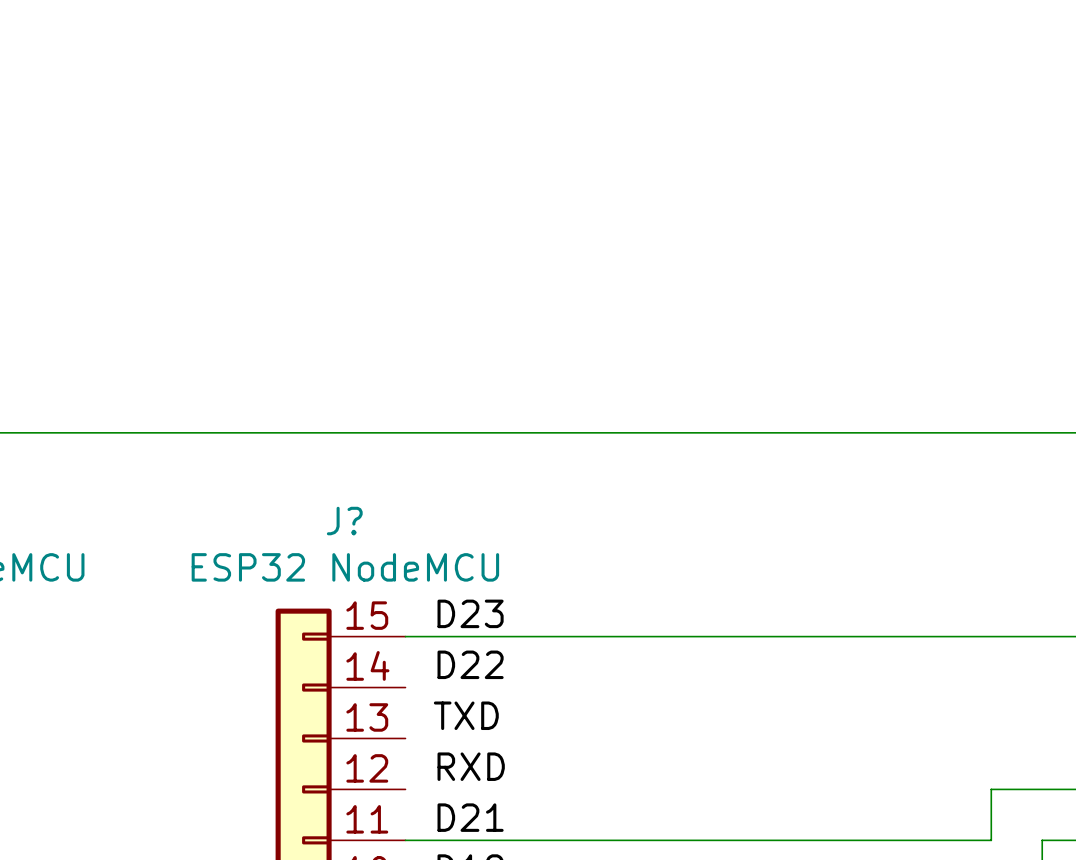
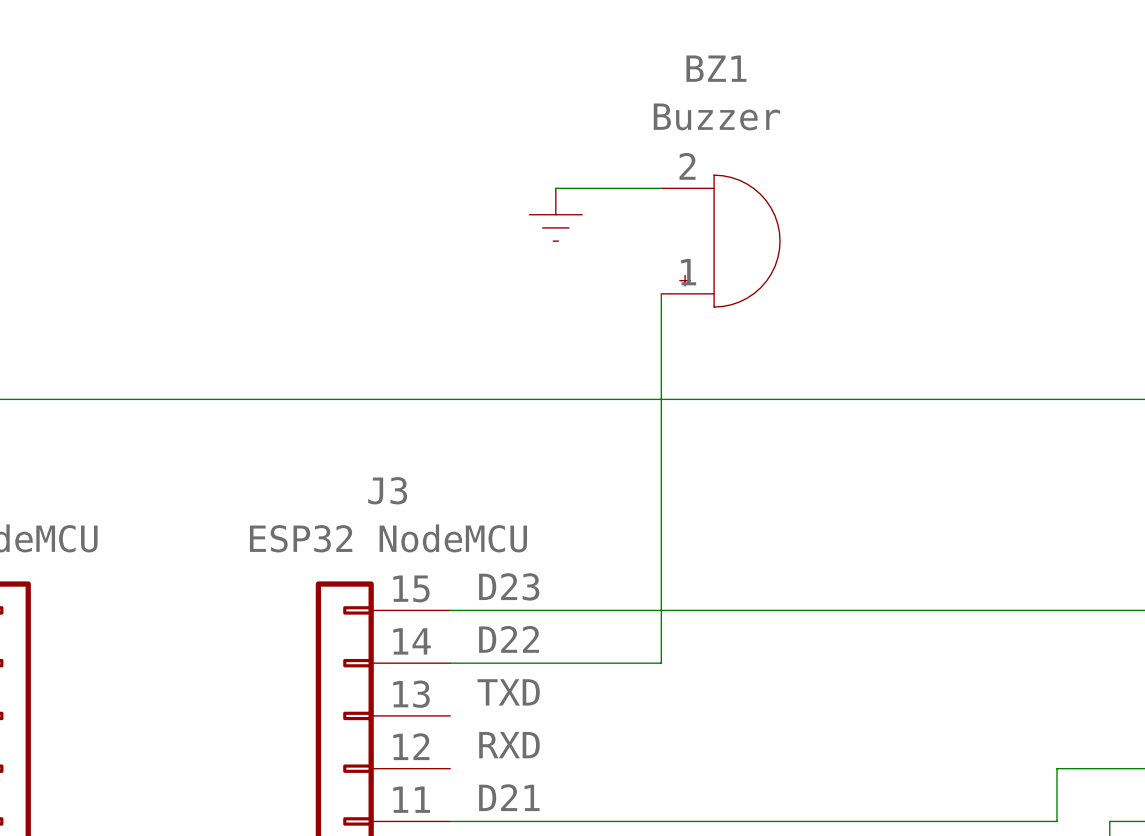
wire: none -> (555, 188) (661, 188)
power symbol: none -> (555, 214)
BZ1: none -> Buzzer (720, 241)
wire: none -> (661, 293) (661, 663) (450, 663)
J? name: J? (344, 521) -> J3 (387, 490)

